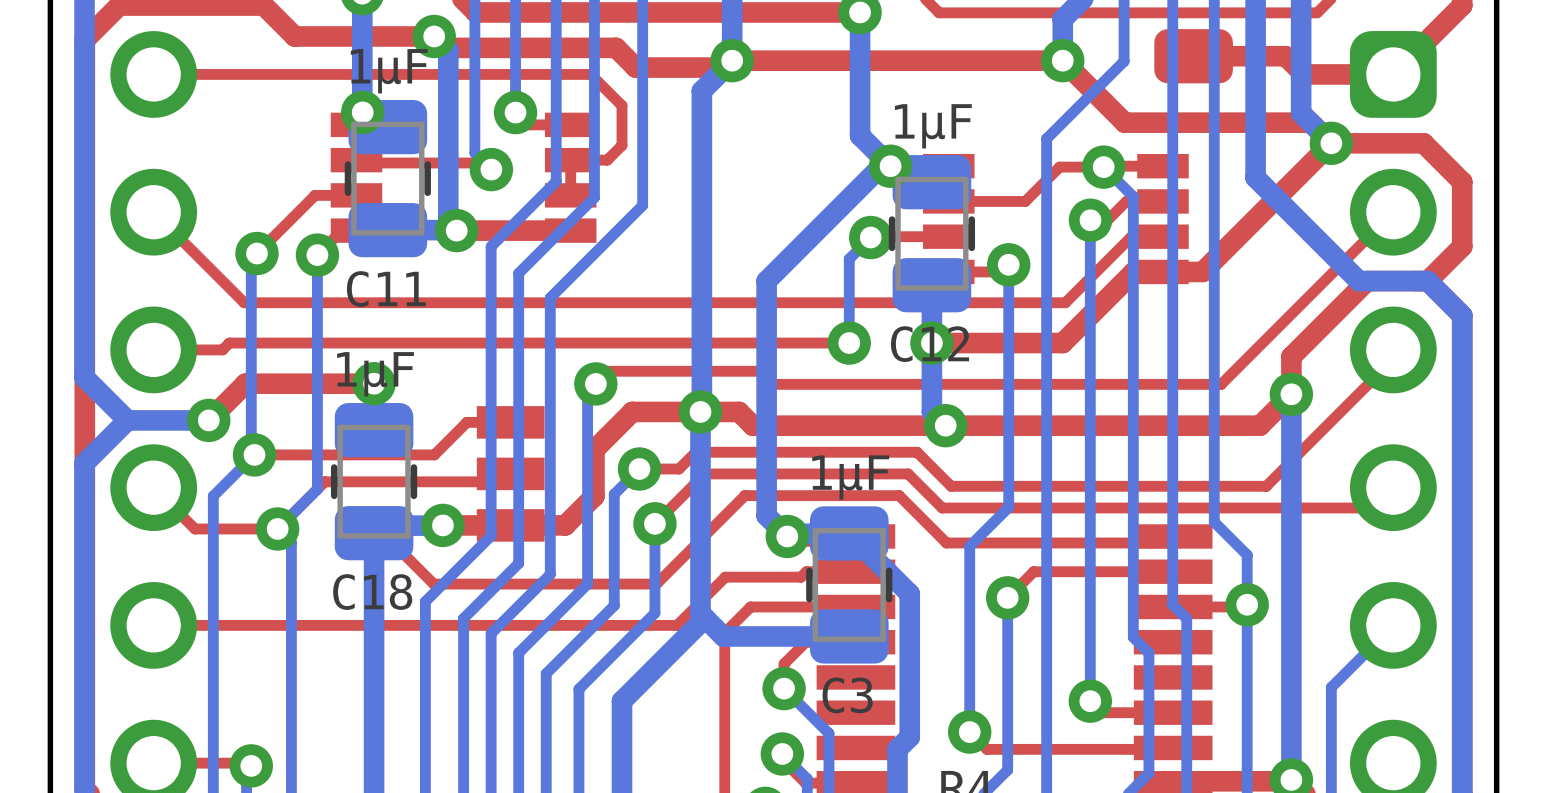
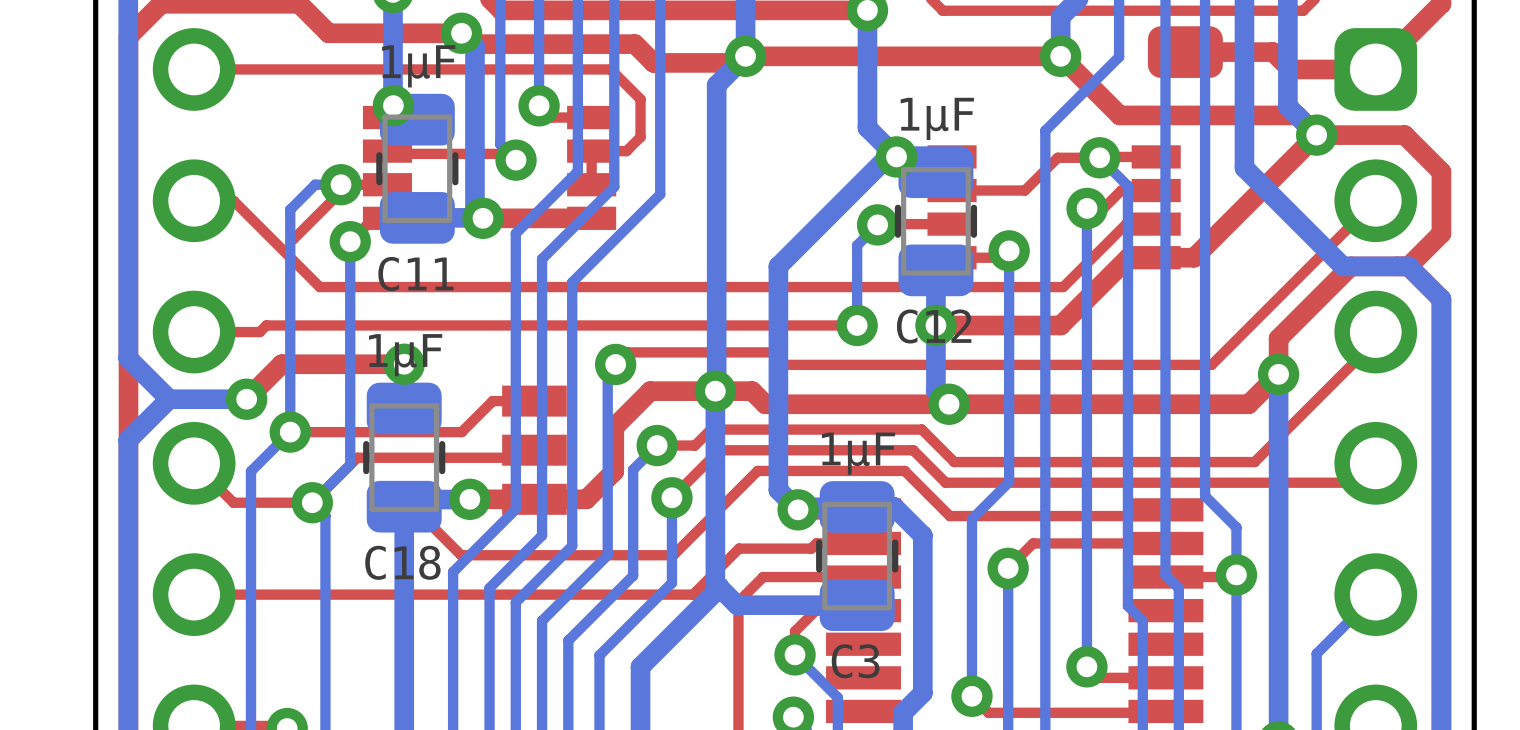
top track: (153, 212) (244, 302) (285, 302) -> (194, 200) (233, 200) (319, 287)
bottom track: (256, 253) (251, 259) (251, 451) (254, 454) -> (341, 184) (315, 184) (290, 209) (290, 432)
via position: (256, 253) -> (341, 184)
bottom track: (849, 533) (909, 593) (909, 737) -> (857, 506) (894, 506) (922, 535) (922, 693) (914, 701)

